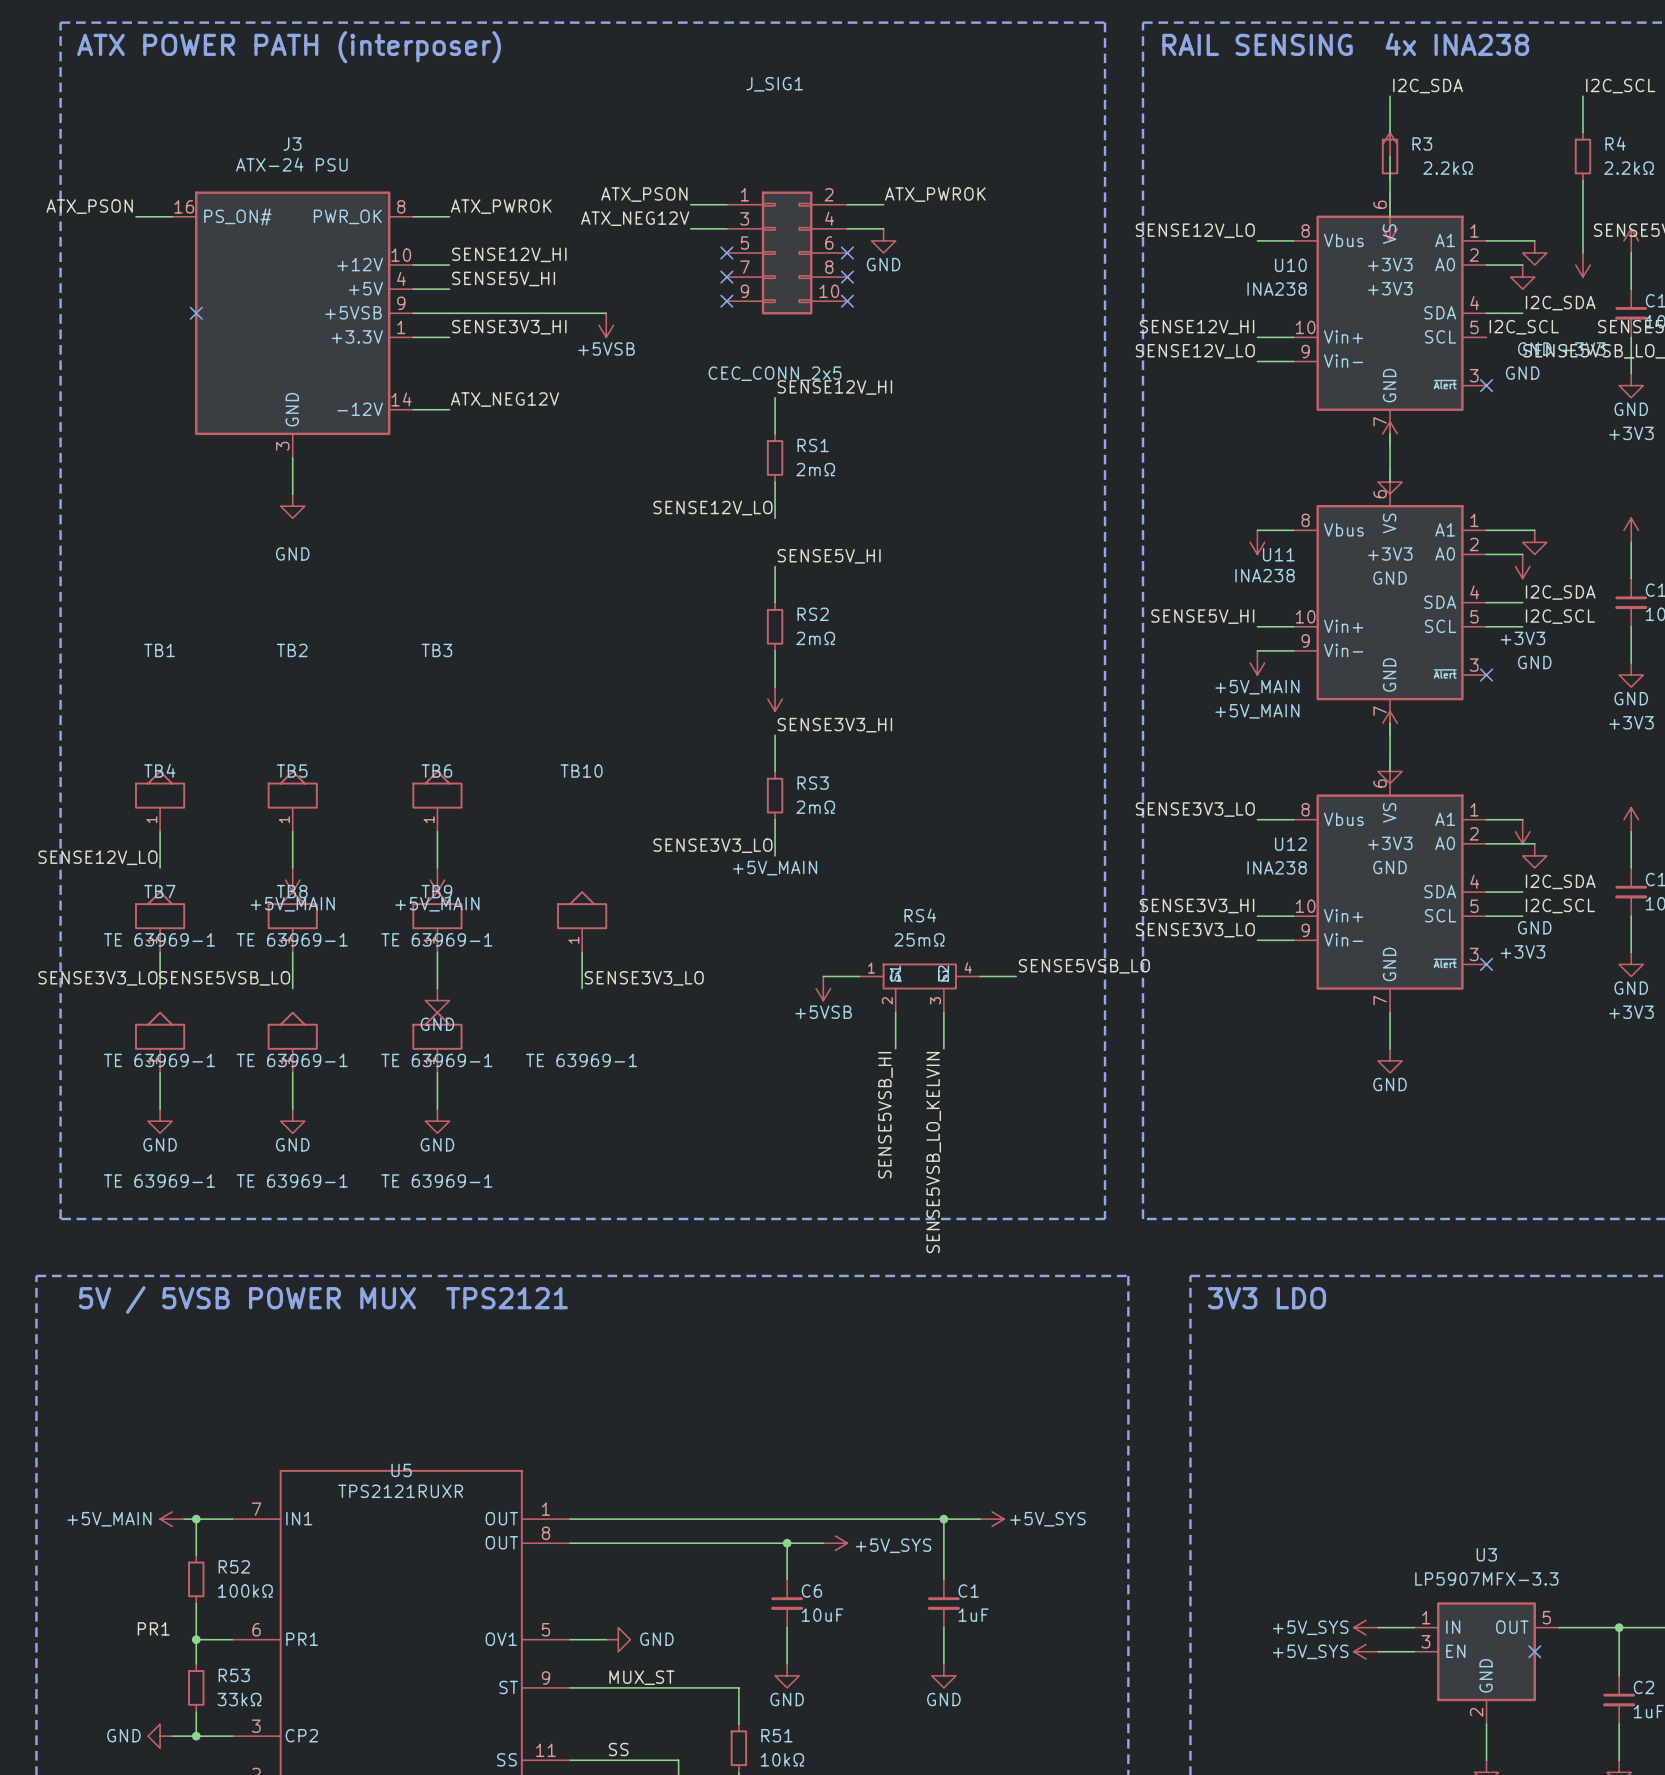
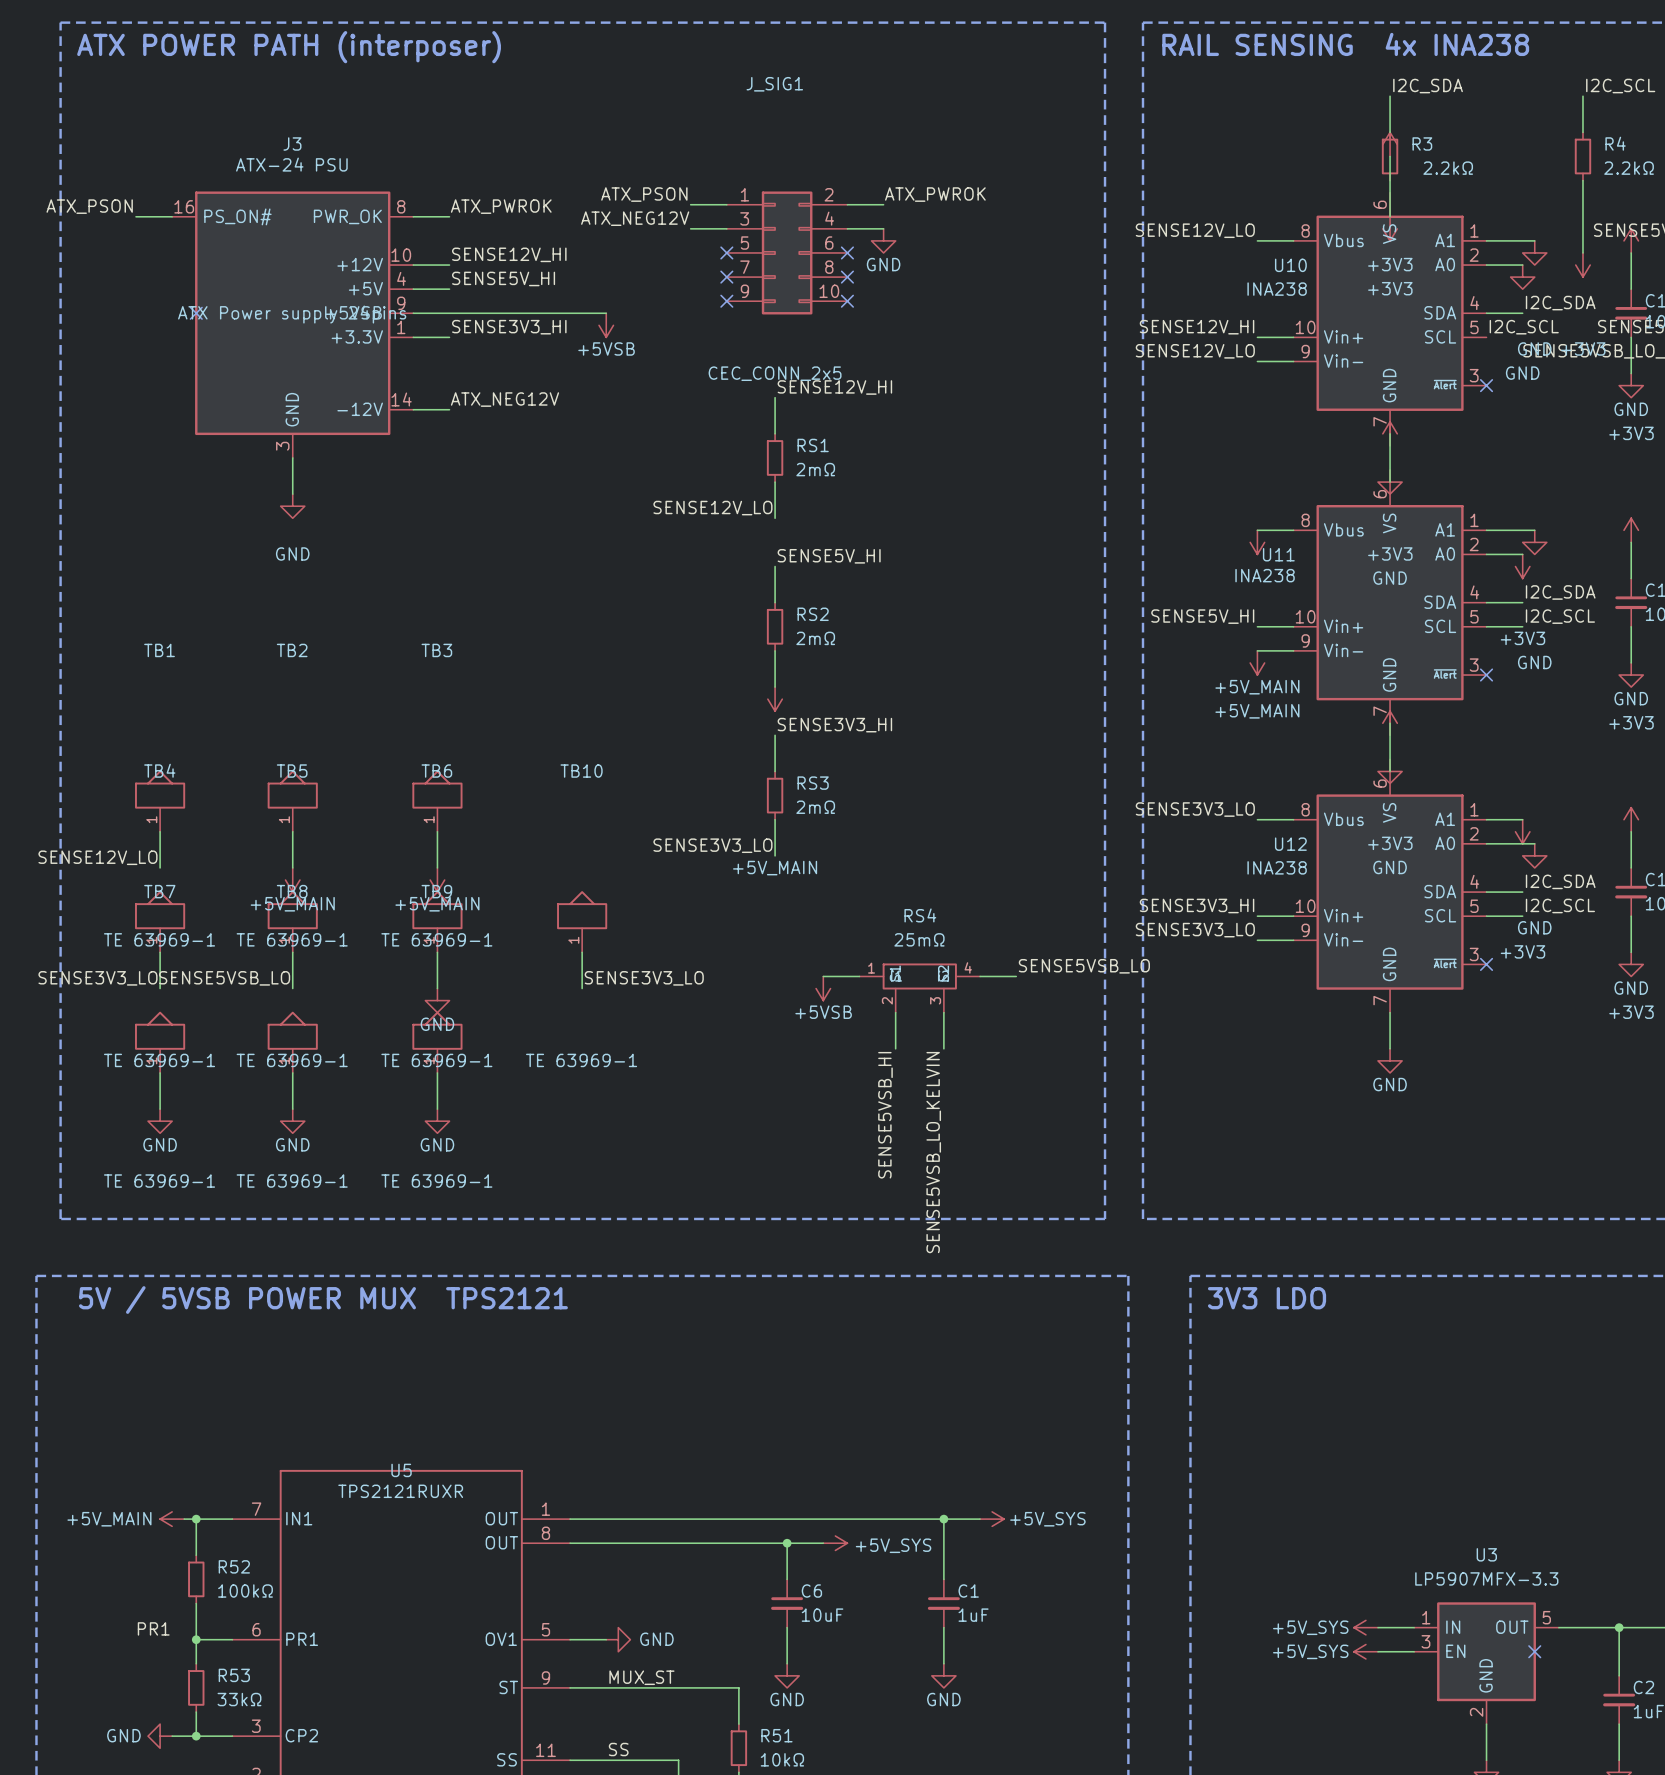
J3 text: none -> ATX Power supply 24pins (292, 314)

